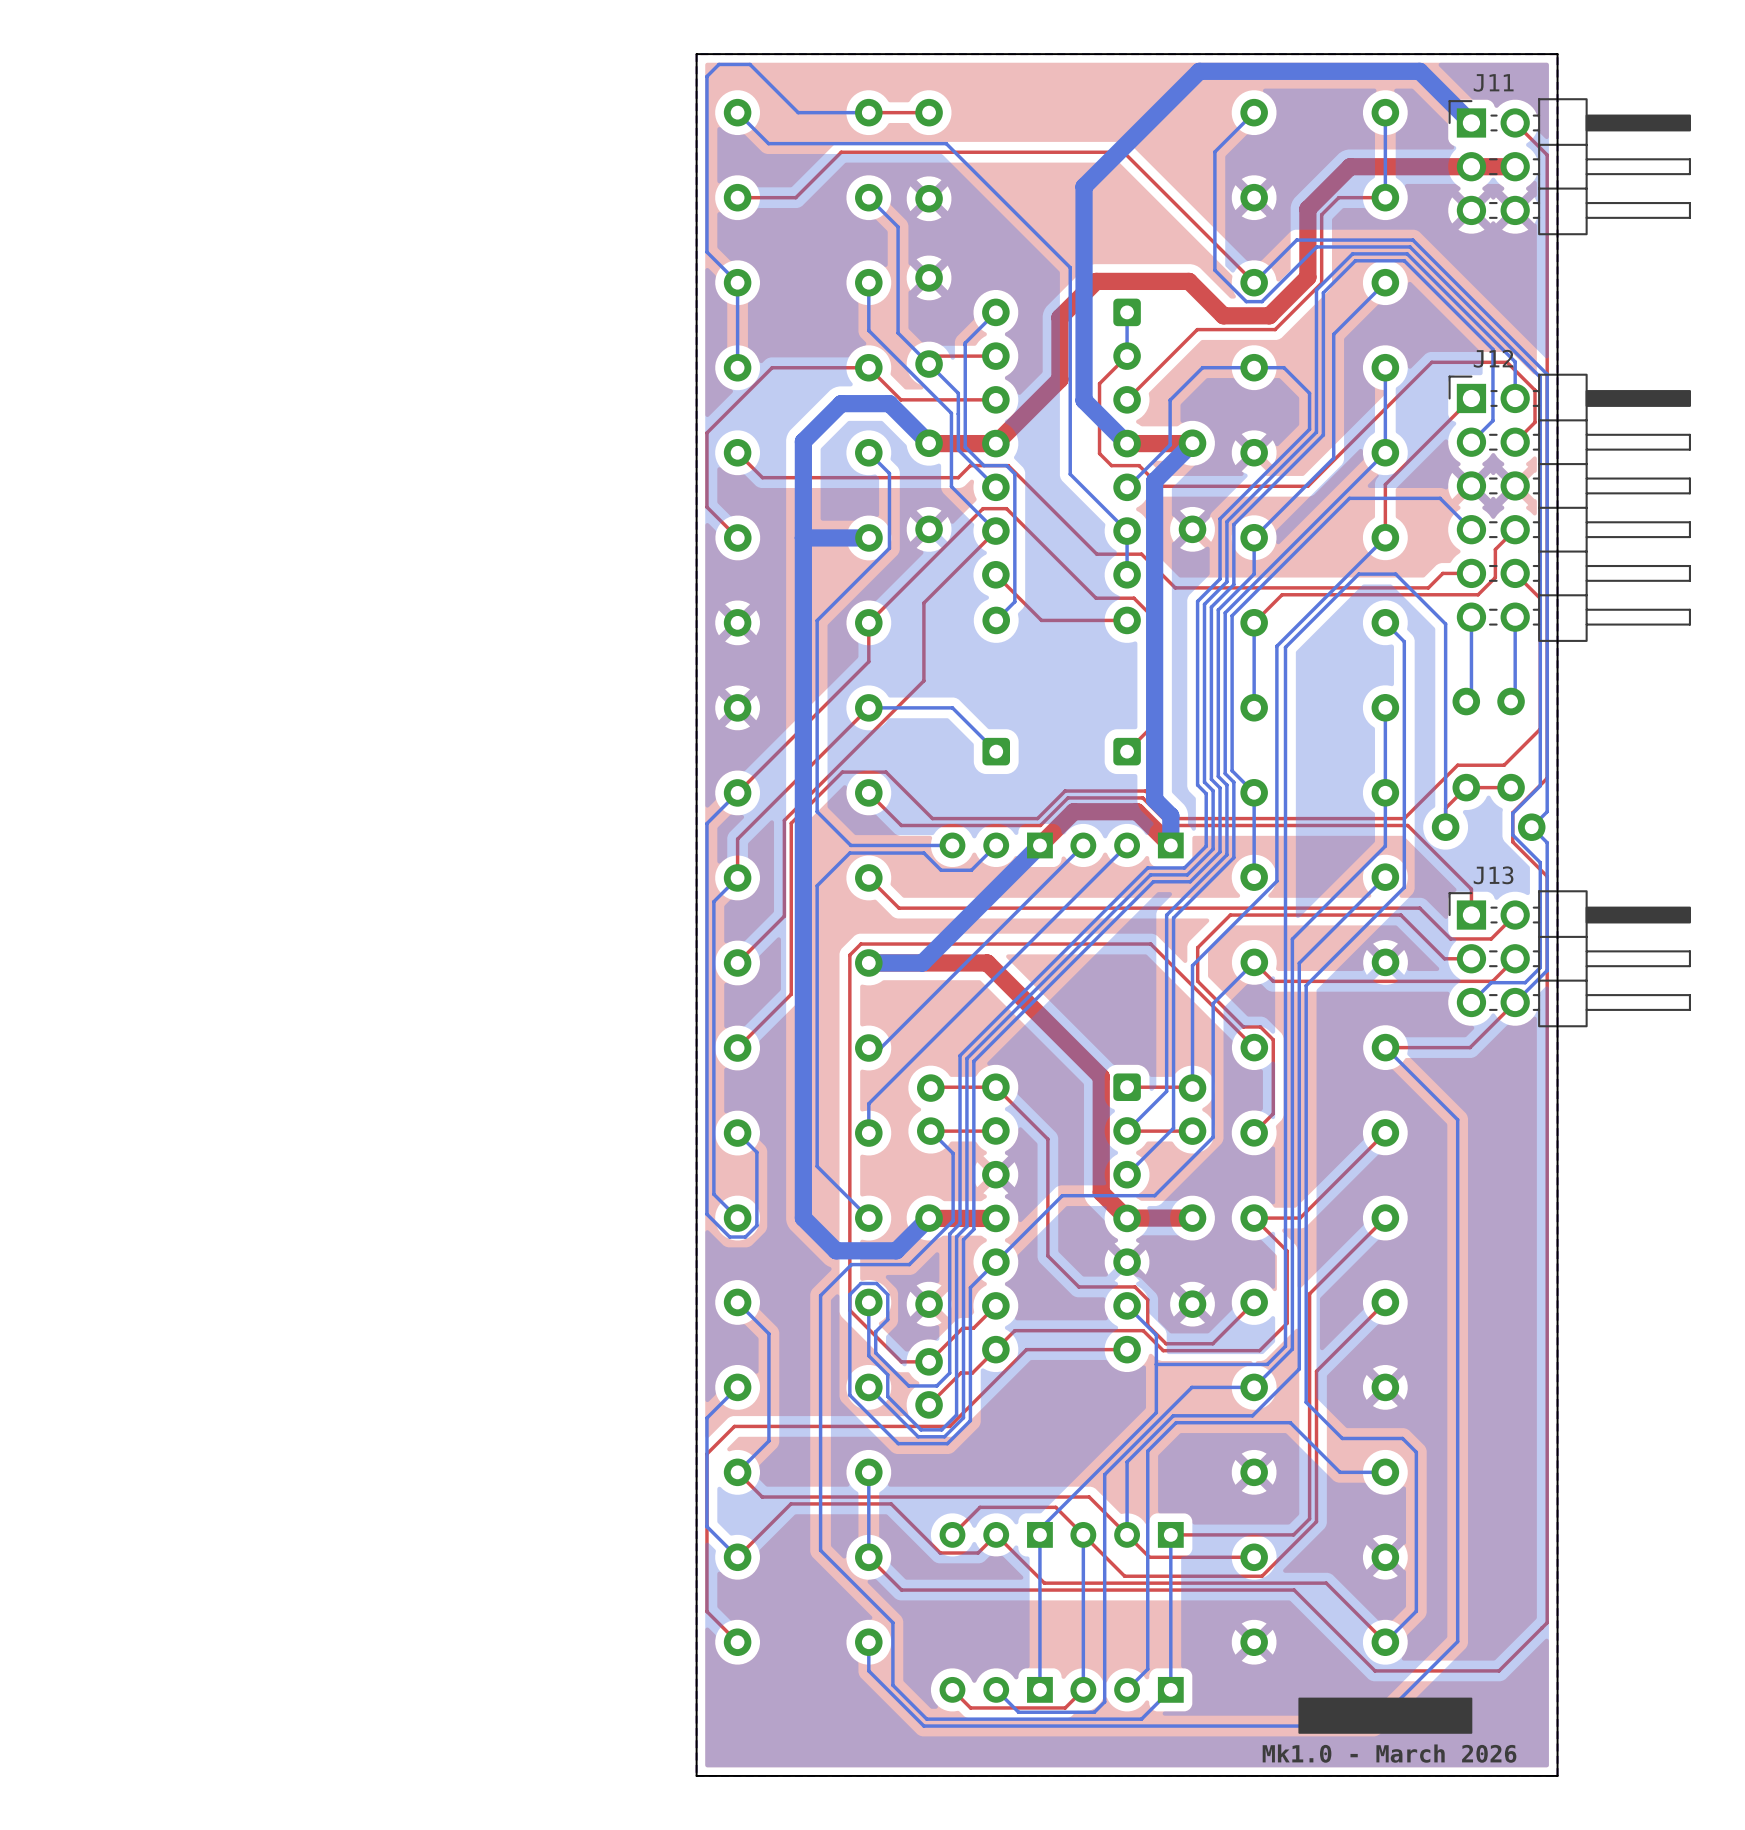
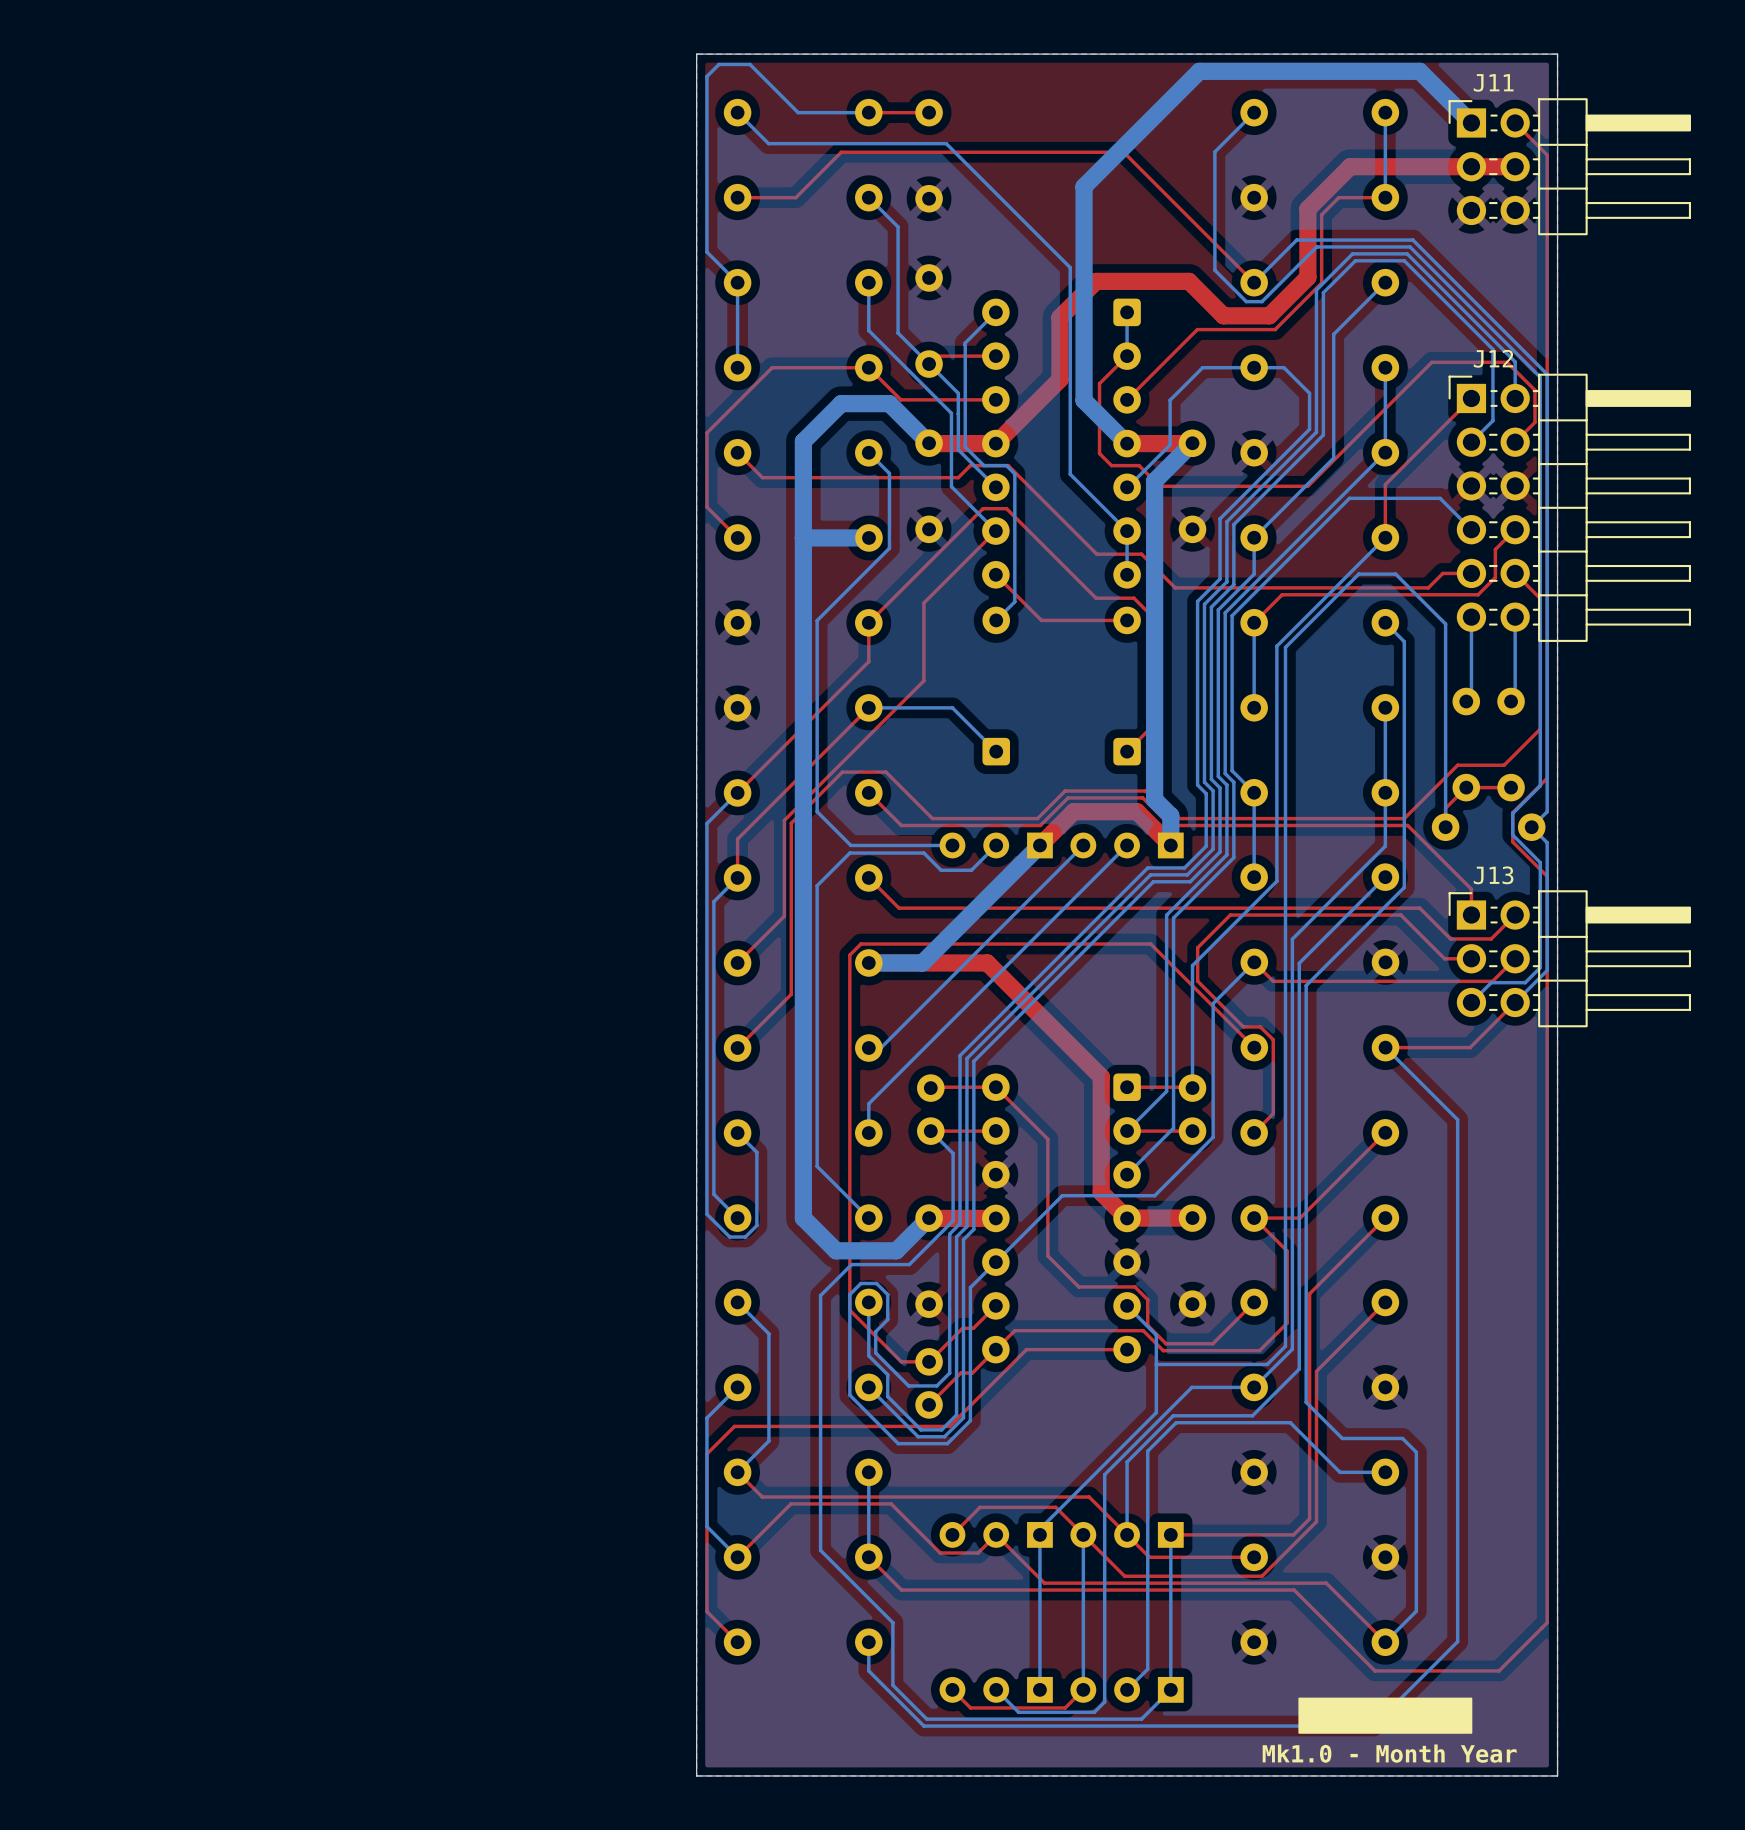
text: Mk1.0 - March 2026 (1389, 1753) -> Mk1.0 - Month Year (1389, 1753)

